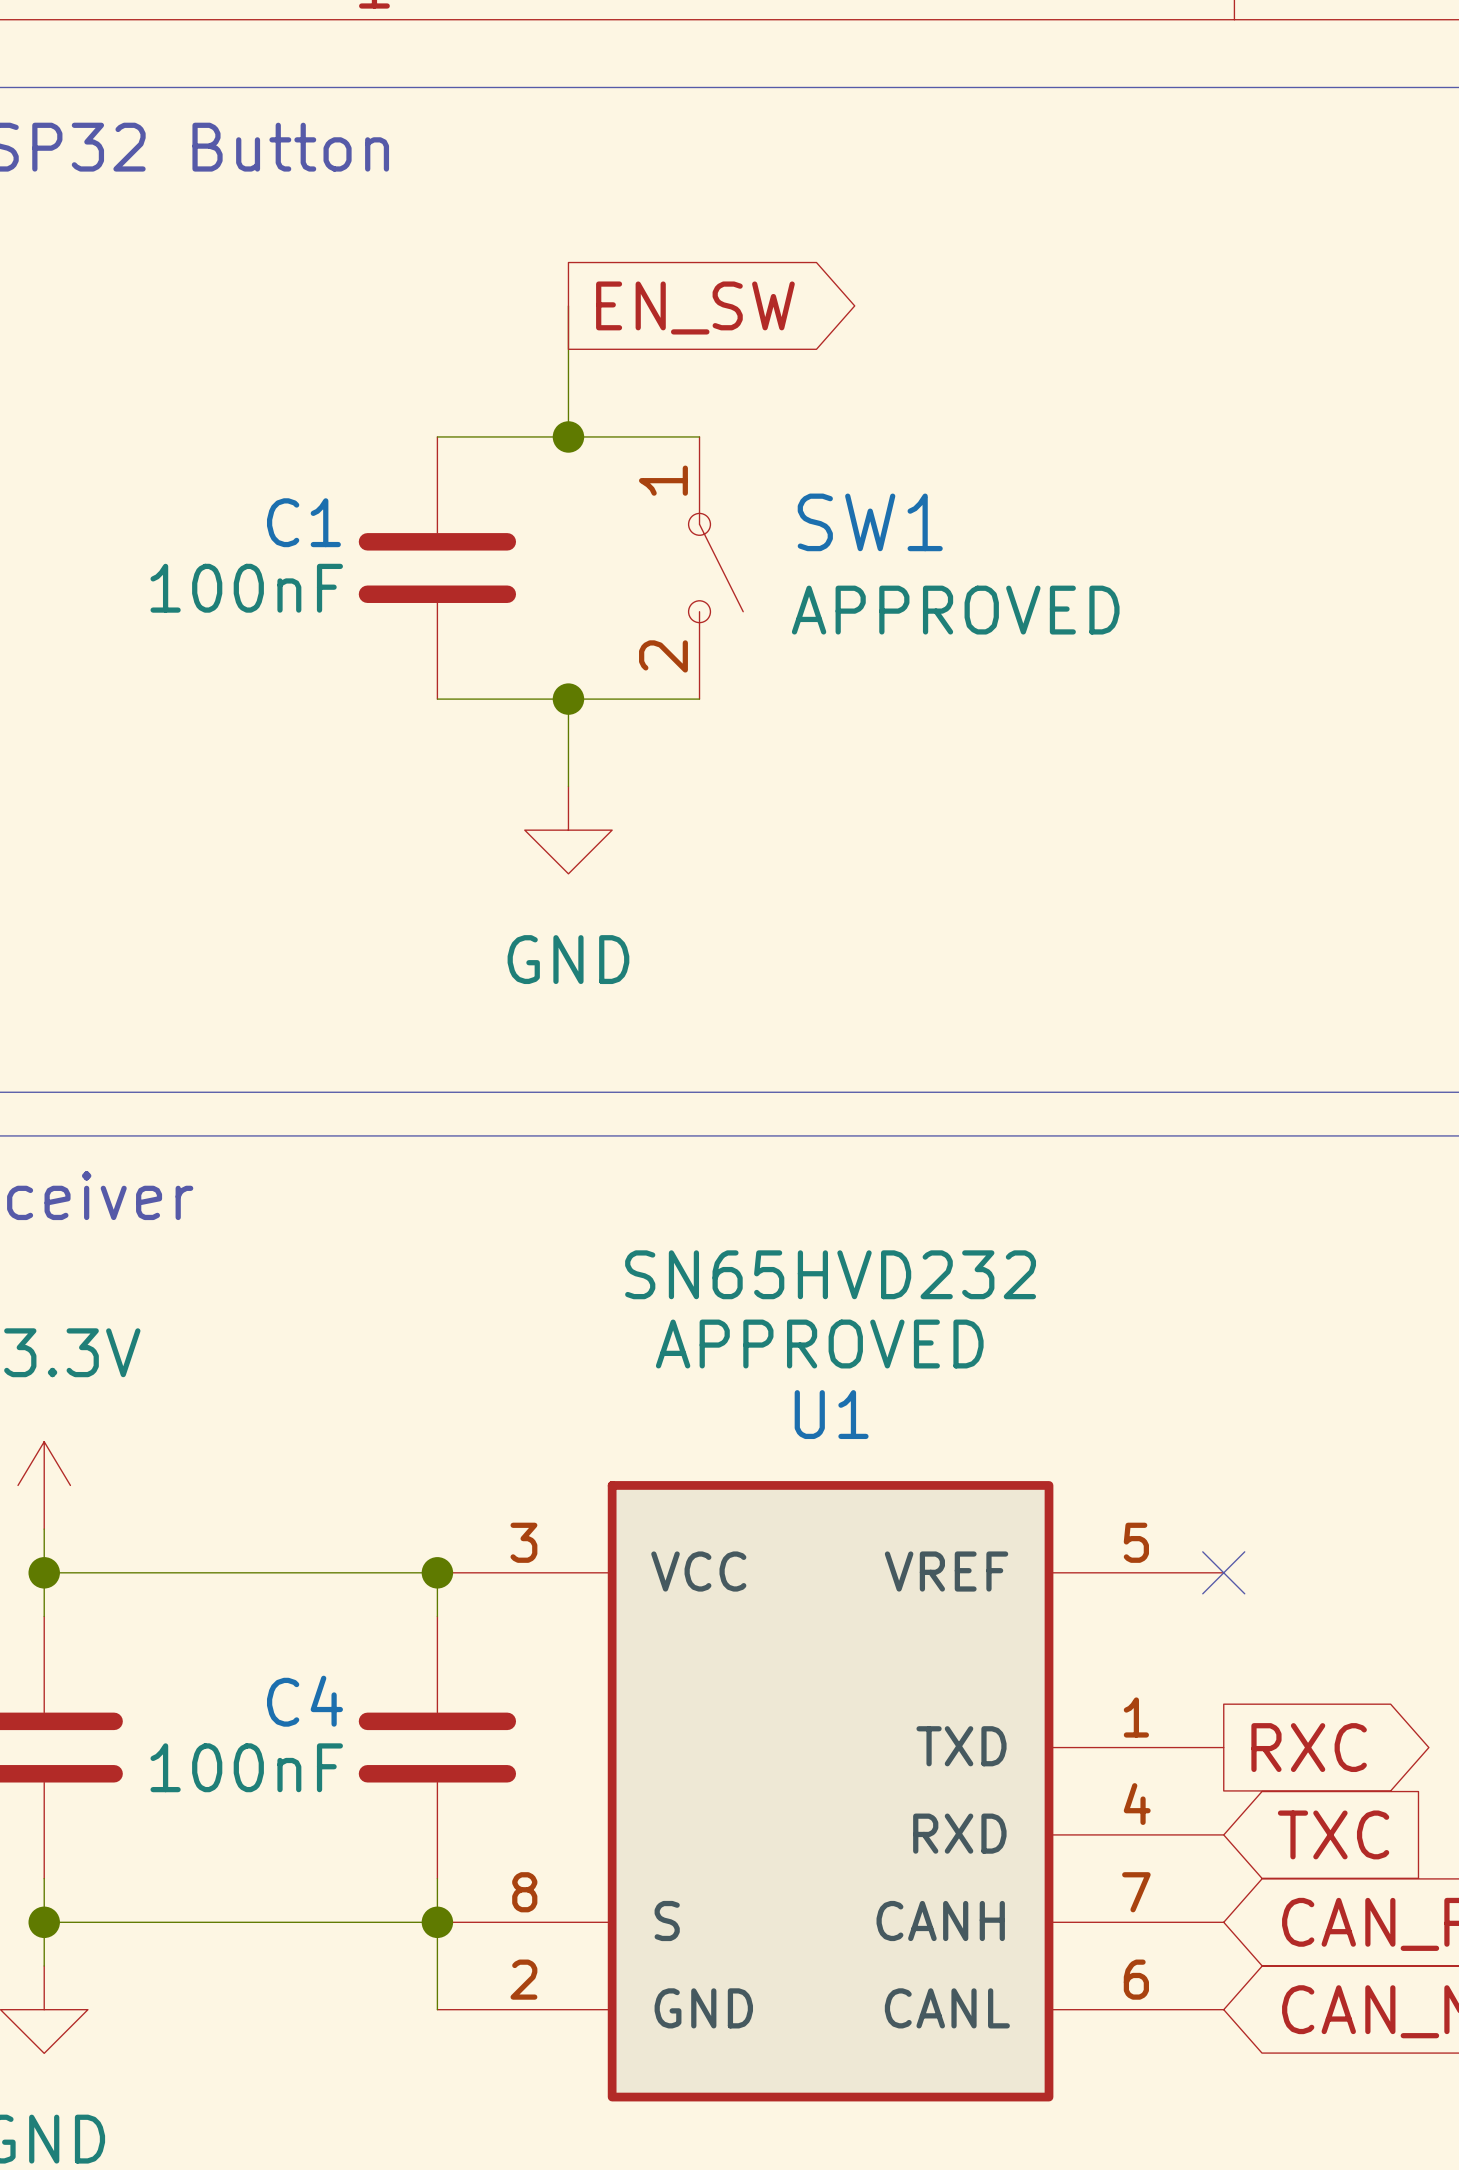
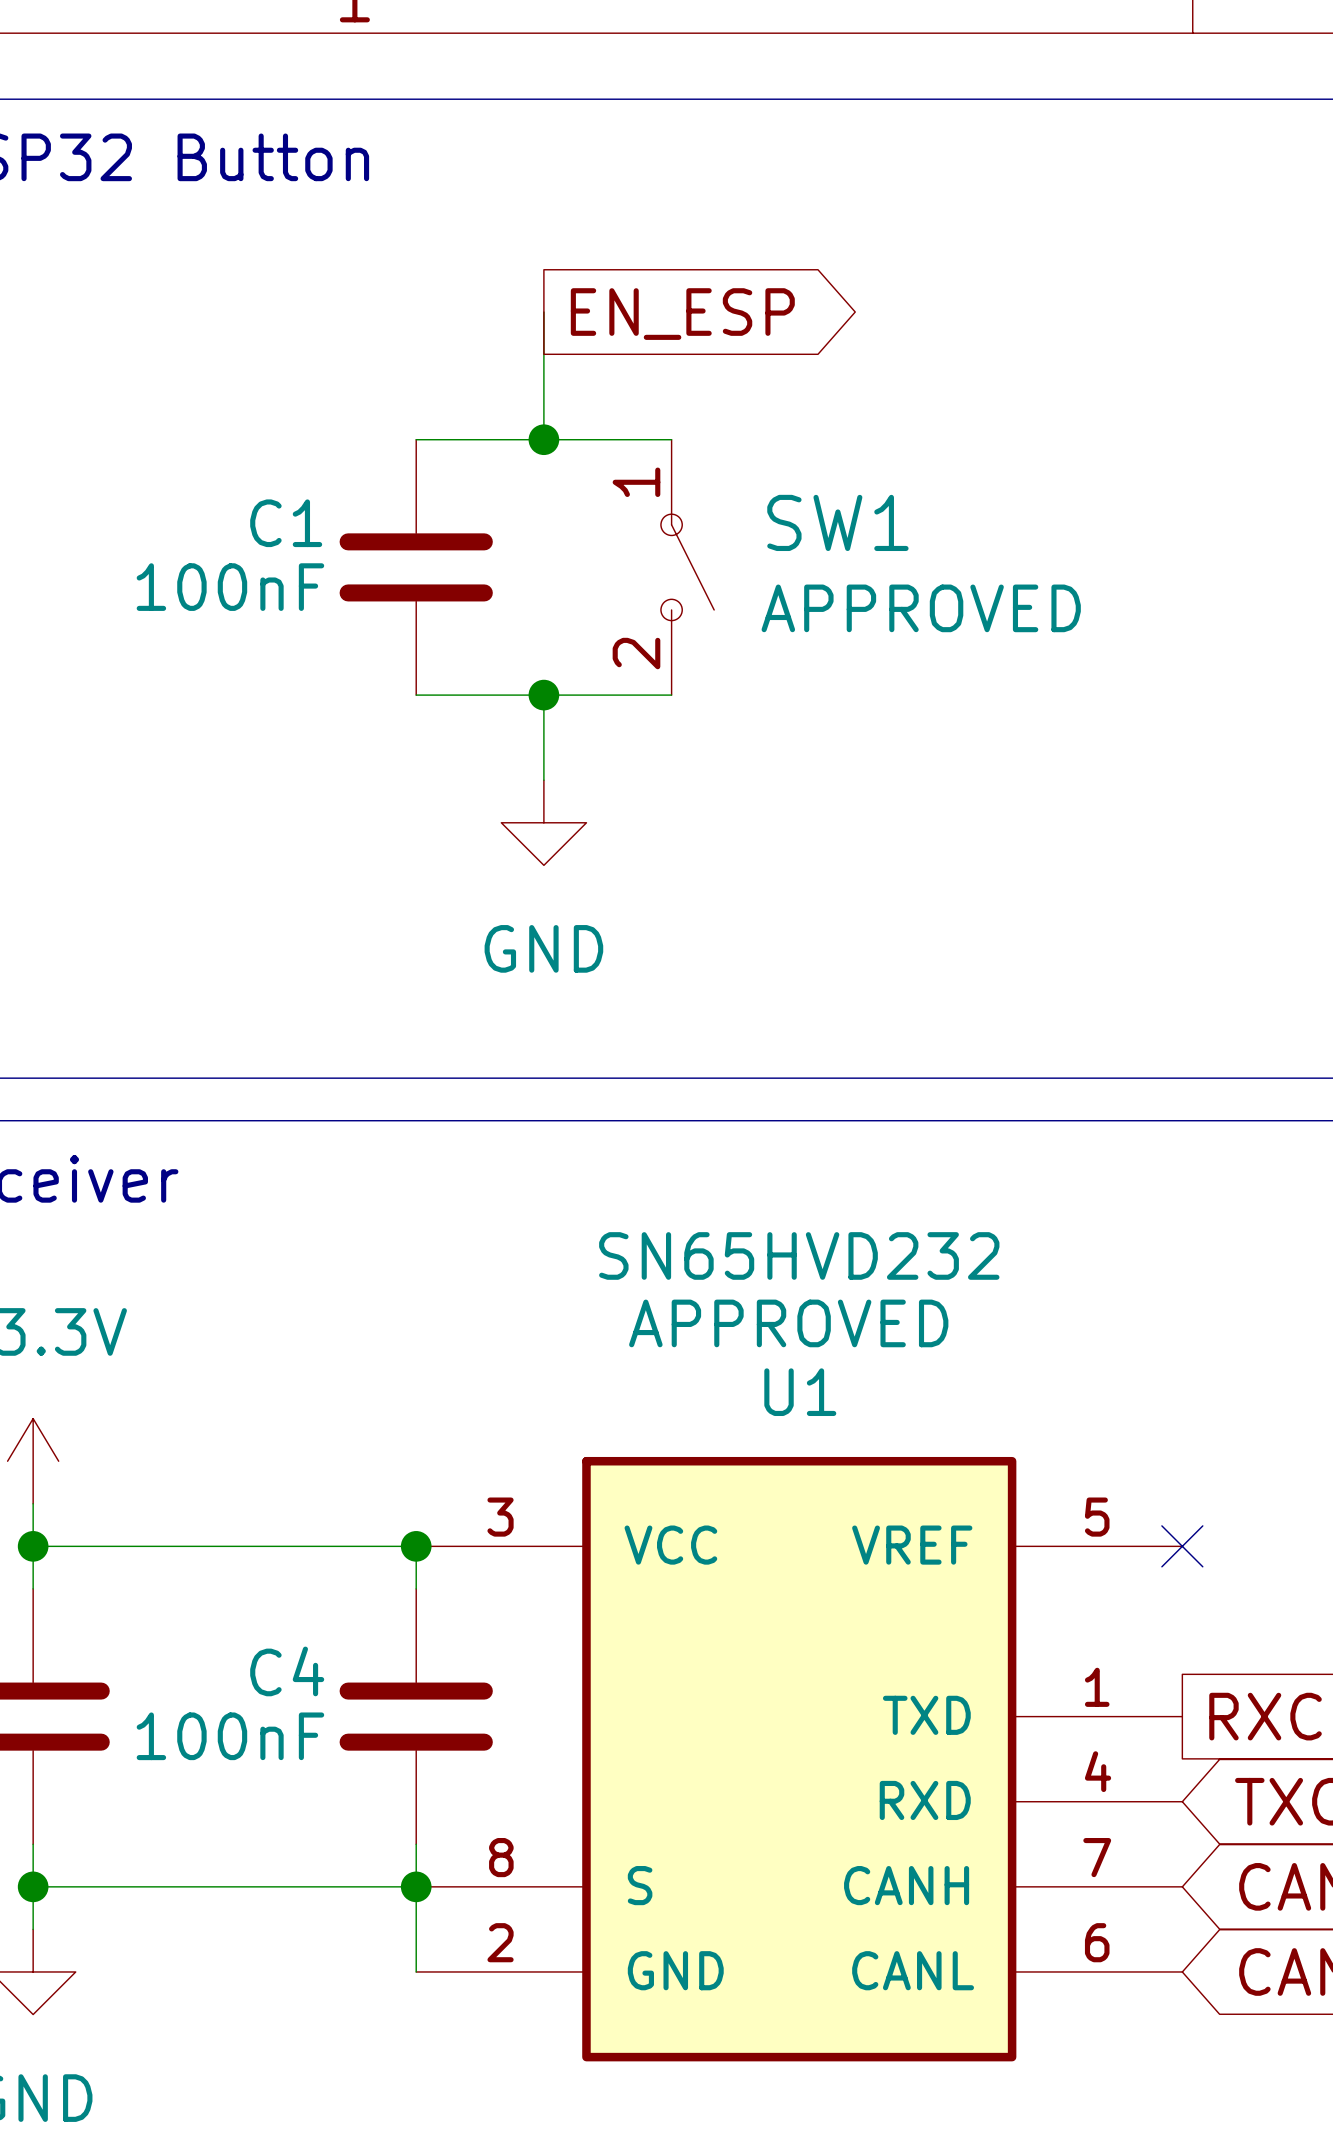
global label: EN_SW (695, 307) -> EN_ESP (682, 314)

